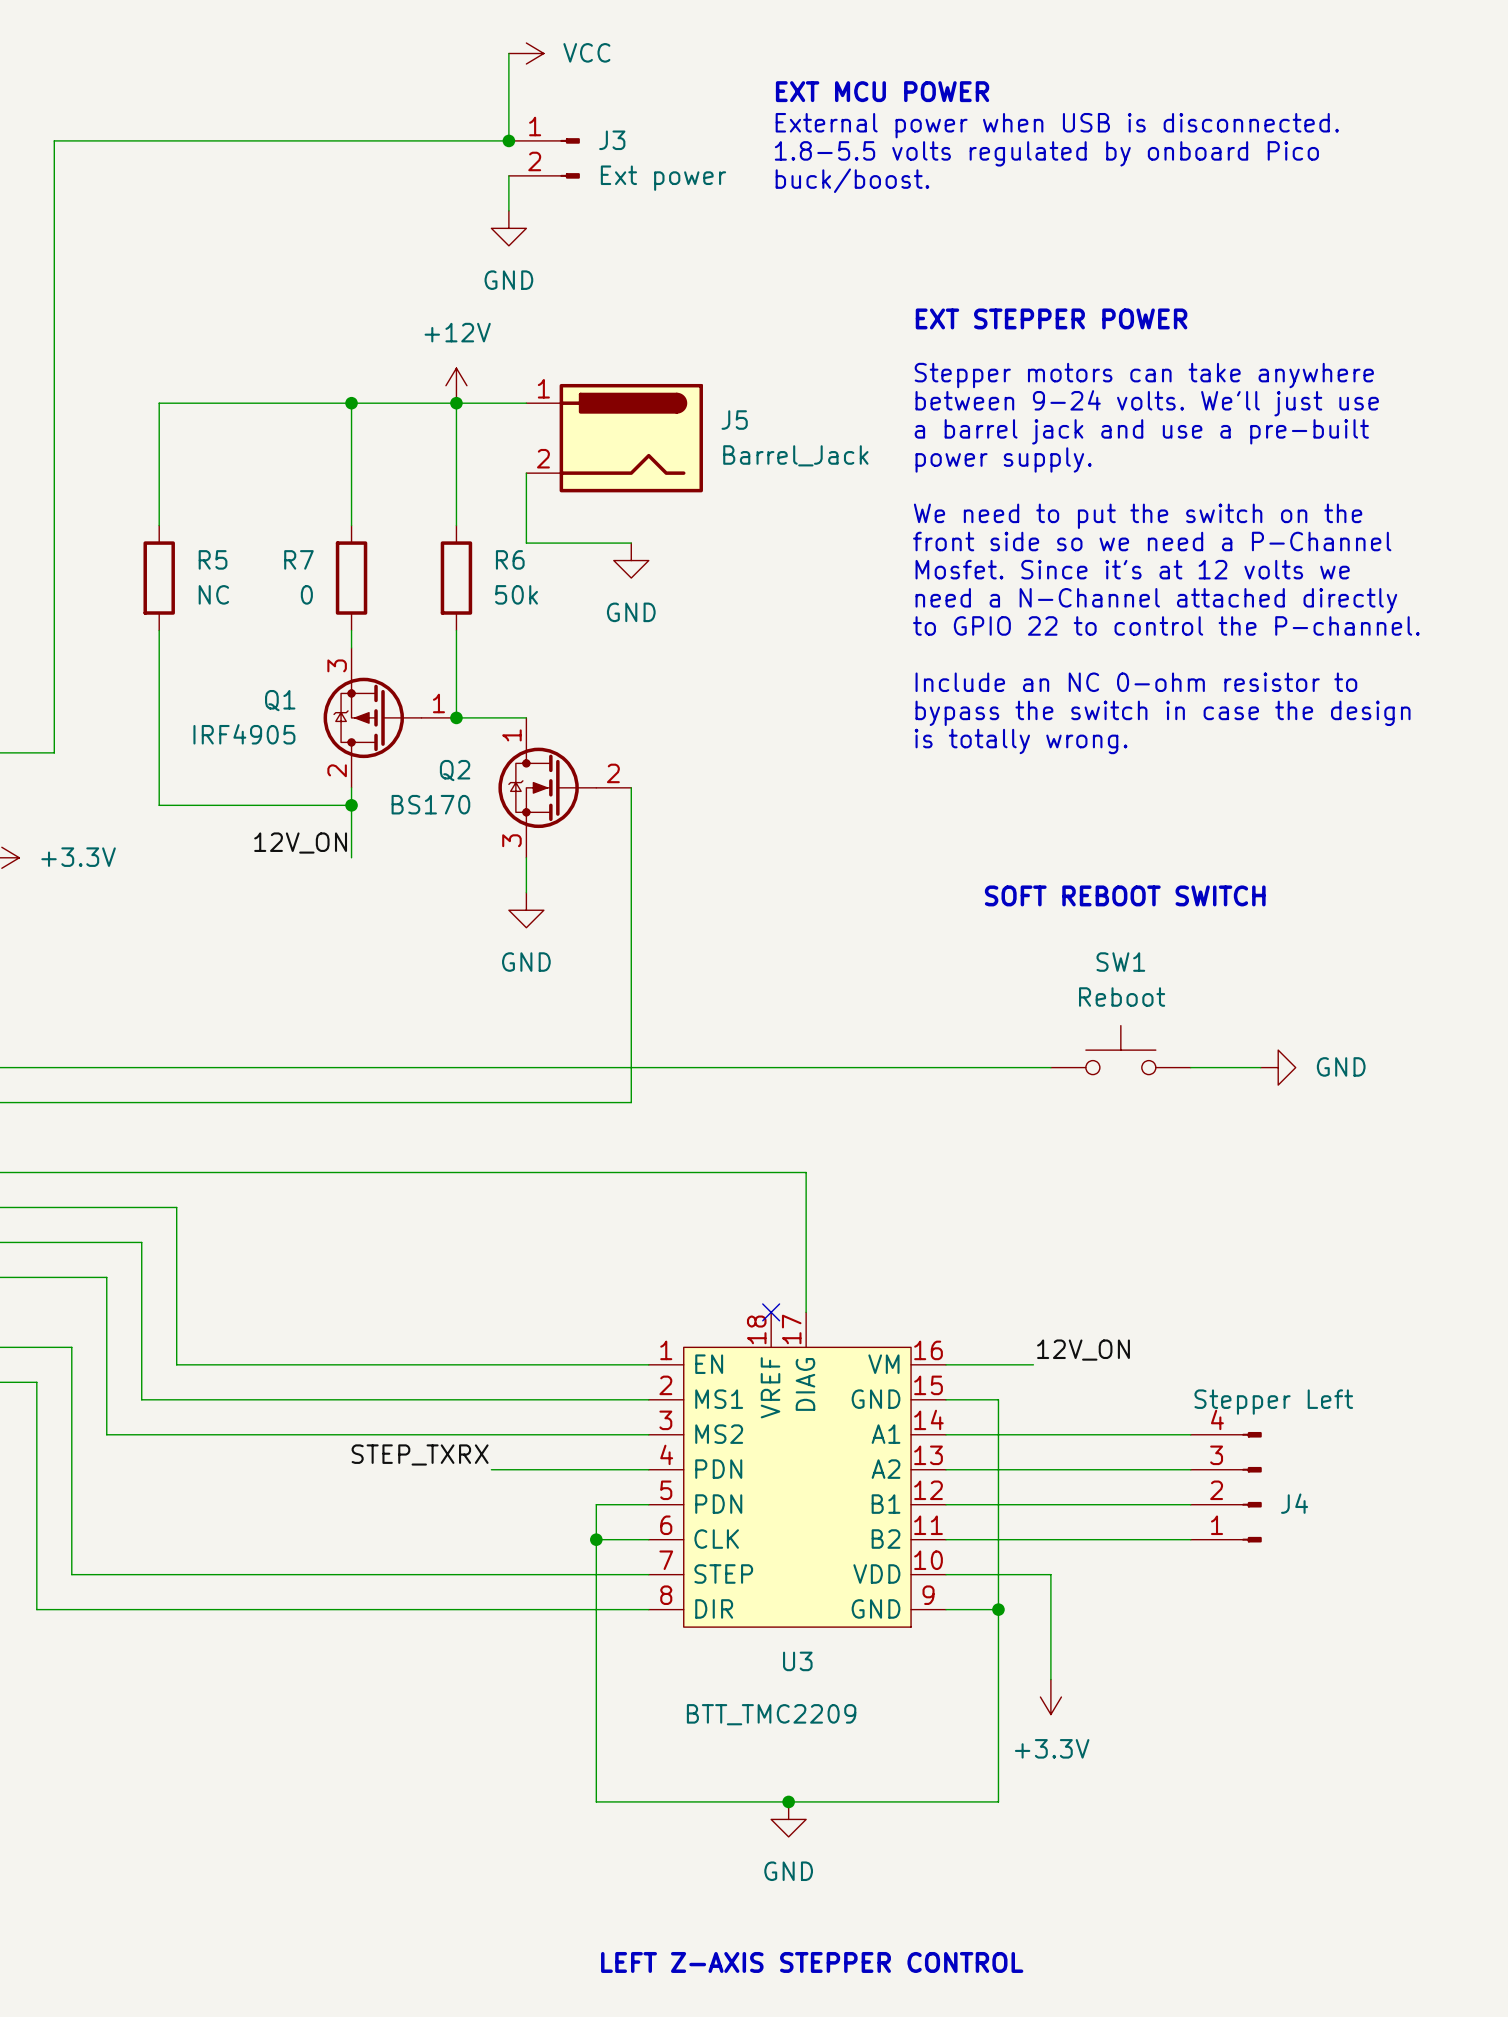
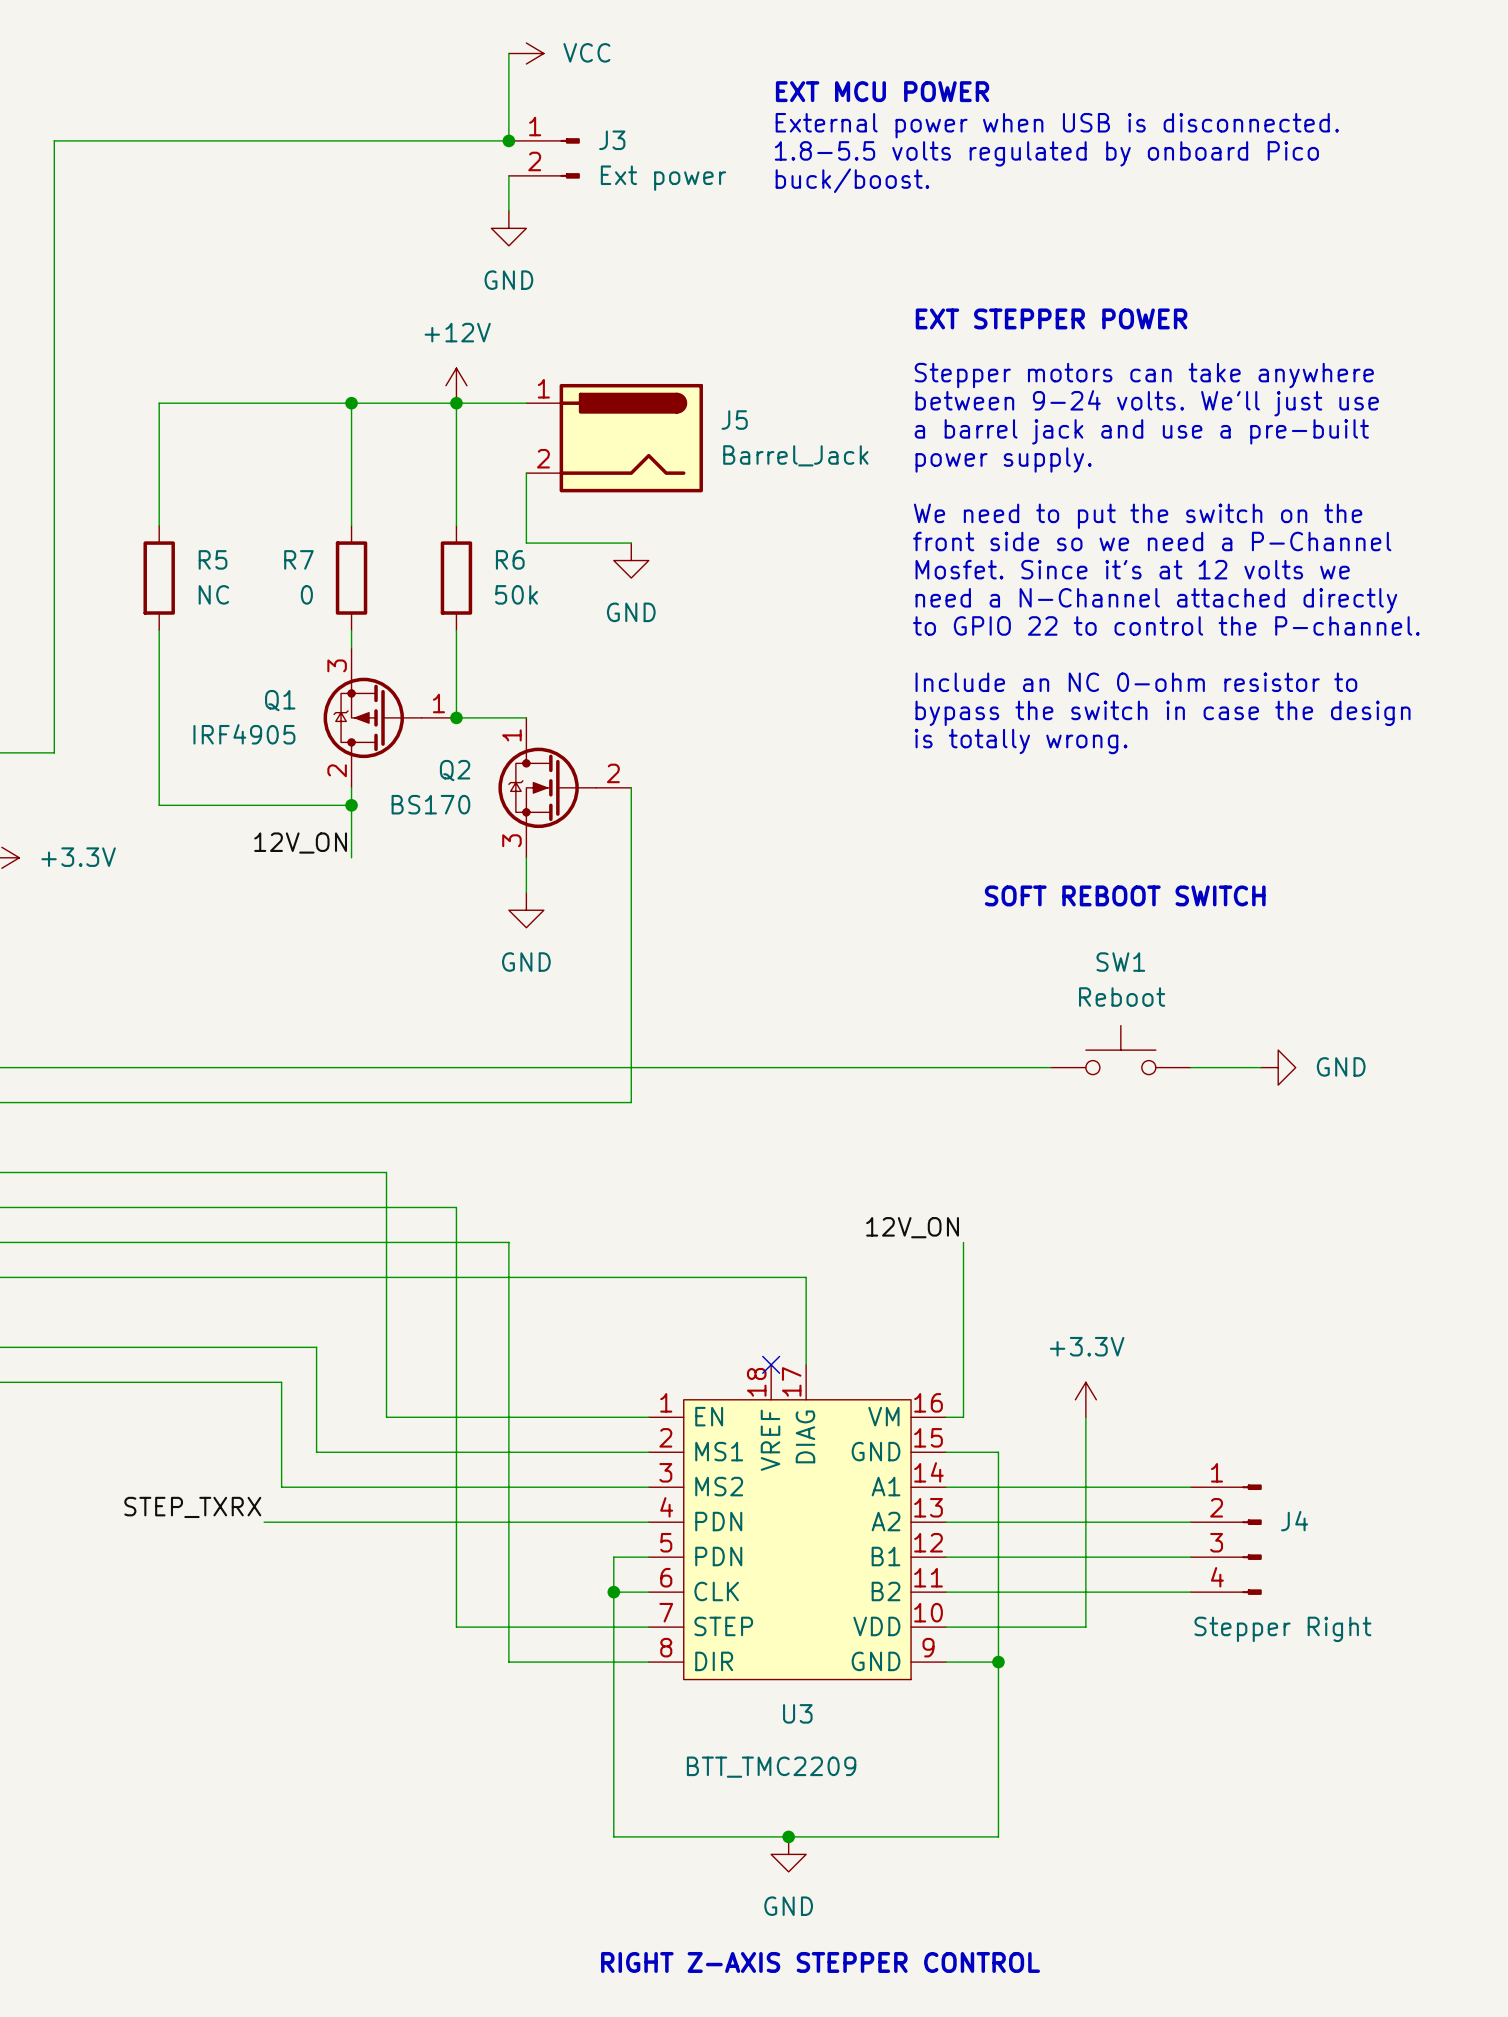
wire: (386, 1172) (806, 1172) (806, 1277) -> (386, 1172) (386, 1417) (648, 1417)
wire: (176, 1207) (176, 1364) (648, 1364) -> (176, 1207) (456, 1207) (456, 1627) (648, 1627)
wire: (141, 1242) (141, 1399) (648, 1399) -> (141, 1242) (508, 1242) (508, 1662) (648, 1662)
wire: none -> (963, 1242) (963, 1417) (946, 1417)
wire: (106, 1277) (106, 1434) (648, 1434) -> (106, 1277) (806, 1277)
no-connect mark position: (771, 1312) -> (771, 1364)
wire: (71, 1347) (71, 1574) (648, 1574) -> (71, 1347) (316, 1347) (316, 1452) (648, 1452)
label position: 12V_ON (1083, 1350) -> 12V_ON (912, 1227)
wire: (946, 1364) (1033, 1364) -> none
wire: (36, 1382) (36, 1609) (648, 1609) -> (36, 1382) (281, 1382) (281, 1487) (648, 1487)
wire: (946, 1399) (998, 1399) (998, 1452) -> (946, 1452) (998, 1452)
J4 value: Stepper Left (1273, 1402) -> Stepper Right (1282, 1629)
wire: none -> (1085, 1417) (1085, 1627) (946, 1627)
wire: (946, 1434) (1190, 1434) -> (946, 1487) (1190, 1487)
label position: STEP_TXRX (420, 1454) -> STEP_TXRX (192, 1507)
wire: (491, 1469) (648, 1469) -> none
U3 position: (797, 1469) -> (797, 1522)
wire: (946, 1469) (1190, 1469) -> (946, 1522) (1190, 1522)
J4 flip: as is (1251, 1487) -> up-down (1251, 1539)
wire: (648, 1504) (596, 1504) (596, 1801) (998, 1801) -> (648, 1557) (613, 1557) (613, 1836) (998, 1836) (998, 1801)
wire: (946, 1504) (1190, 1504) -> (946, 1557) (1190, 1557)
wire: none -> (264, 1522) (648, 1522)
wire: (596, 1539) (648, 1539) -> none
junction position: (596, 1539) -> (613, 1592)
wire: (946, 1539) (1190, 1539) -> (946, 1592) (1190, 1592)
wire: (946, 1574) (1050, 1574) (1050, 1679) -> none
wire: none -> (613, 1592) (648, 1592)
wire: (946, 1609) (998, 1609) -> (946, 1662) (998, 1662)
junction position: (998, 1609) -> (998, 1662)
power symbol rotation: 0° (1050, 1697) -> 180° (1085, 1399)
power symbol position: +3.3V (1050, 1697) -> +3.3V (1085, 1399)
junction position: (788, 1801) -> (788, 1836)
power symbol position: GND (788, 1819) -> GND (788, 1854)
text: LEFT Z-AXIS STEPPER CONTROL (812, 1962) -> RIGHT Z-AXIS STEPPER CONTROL (820, 1962)

